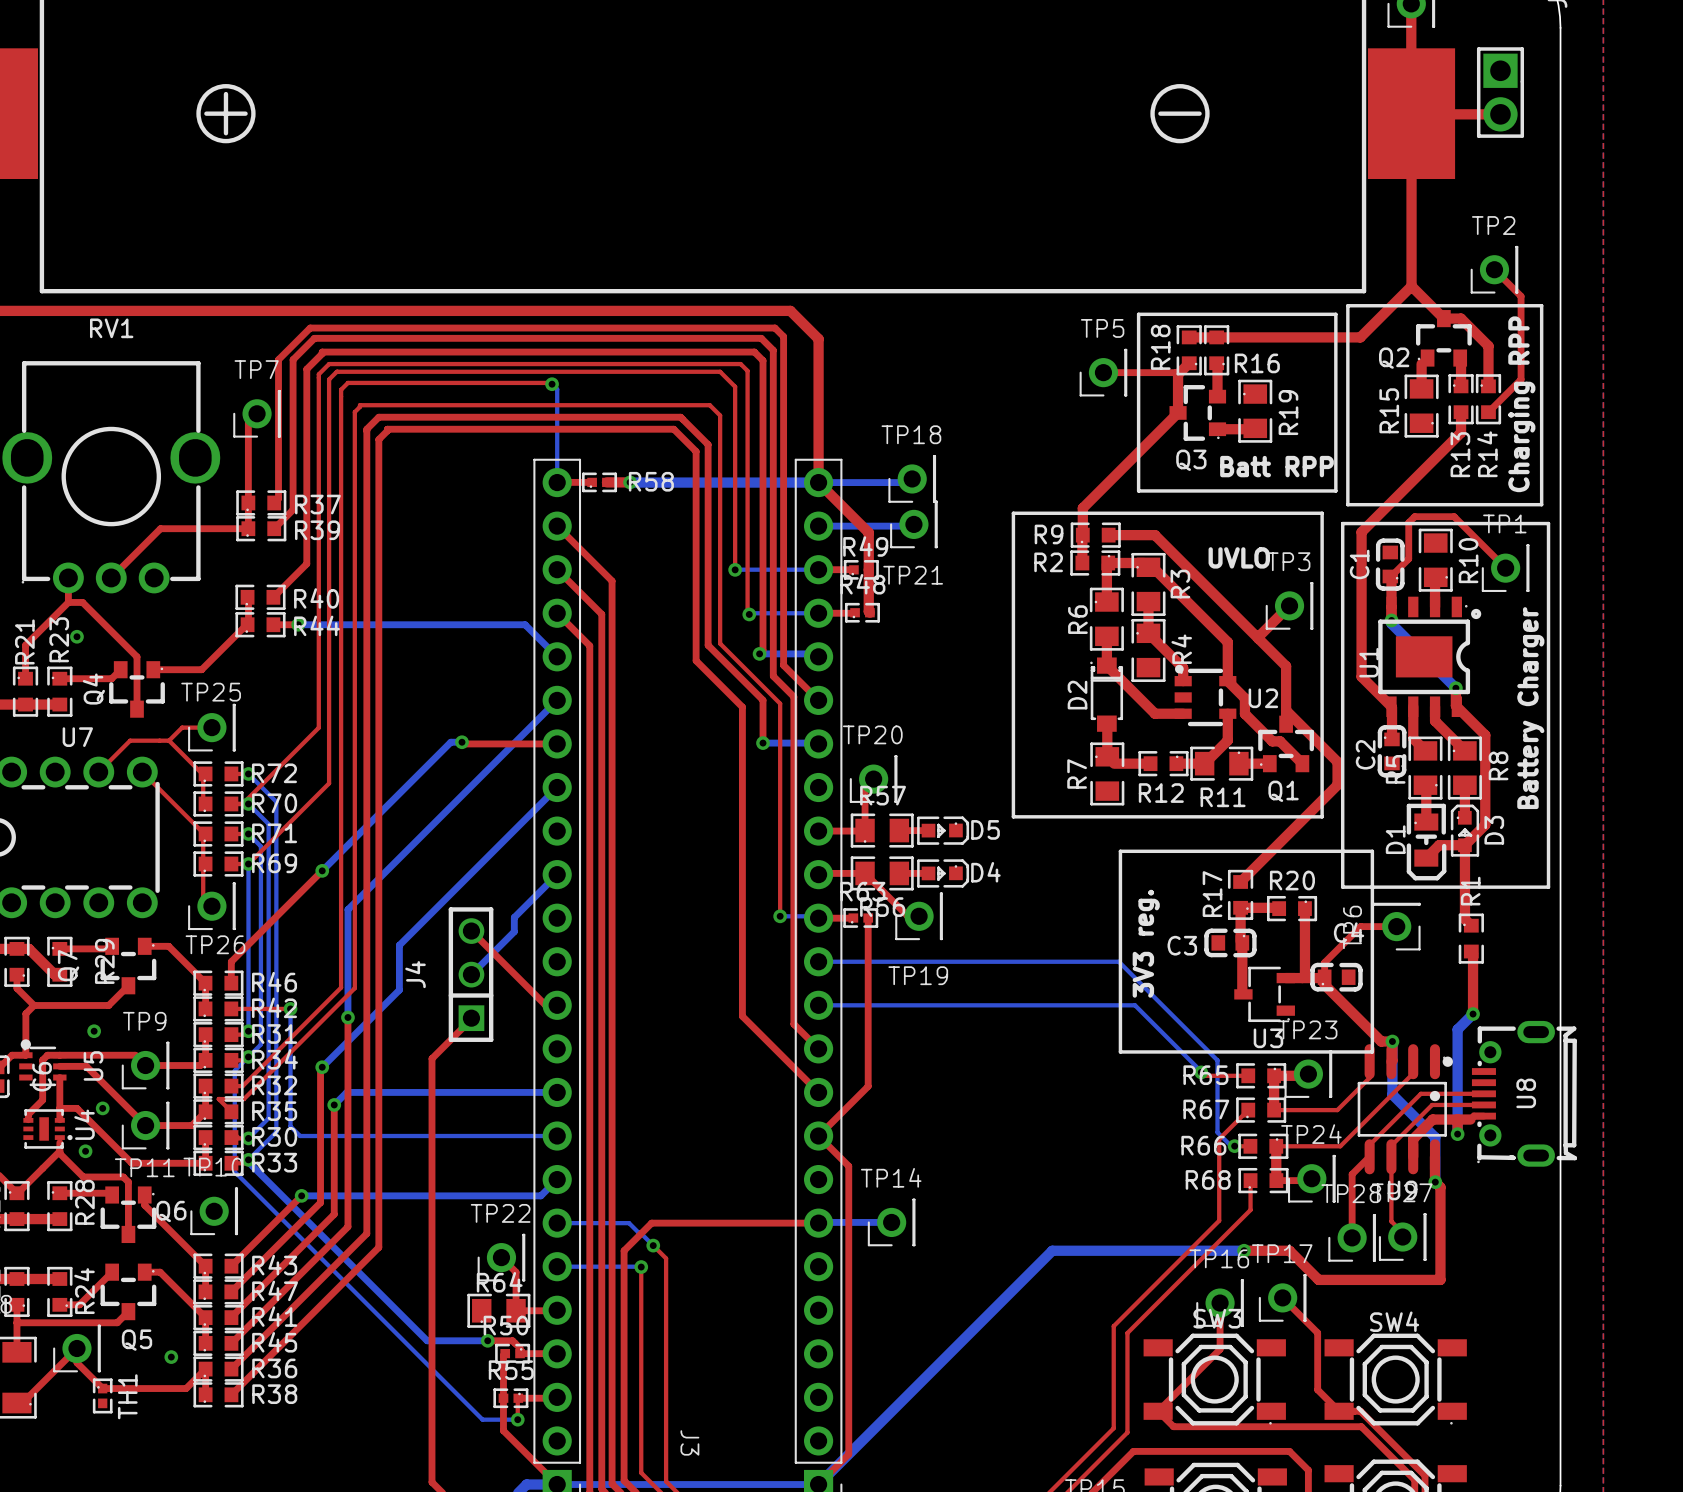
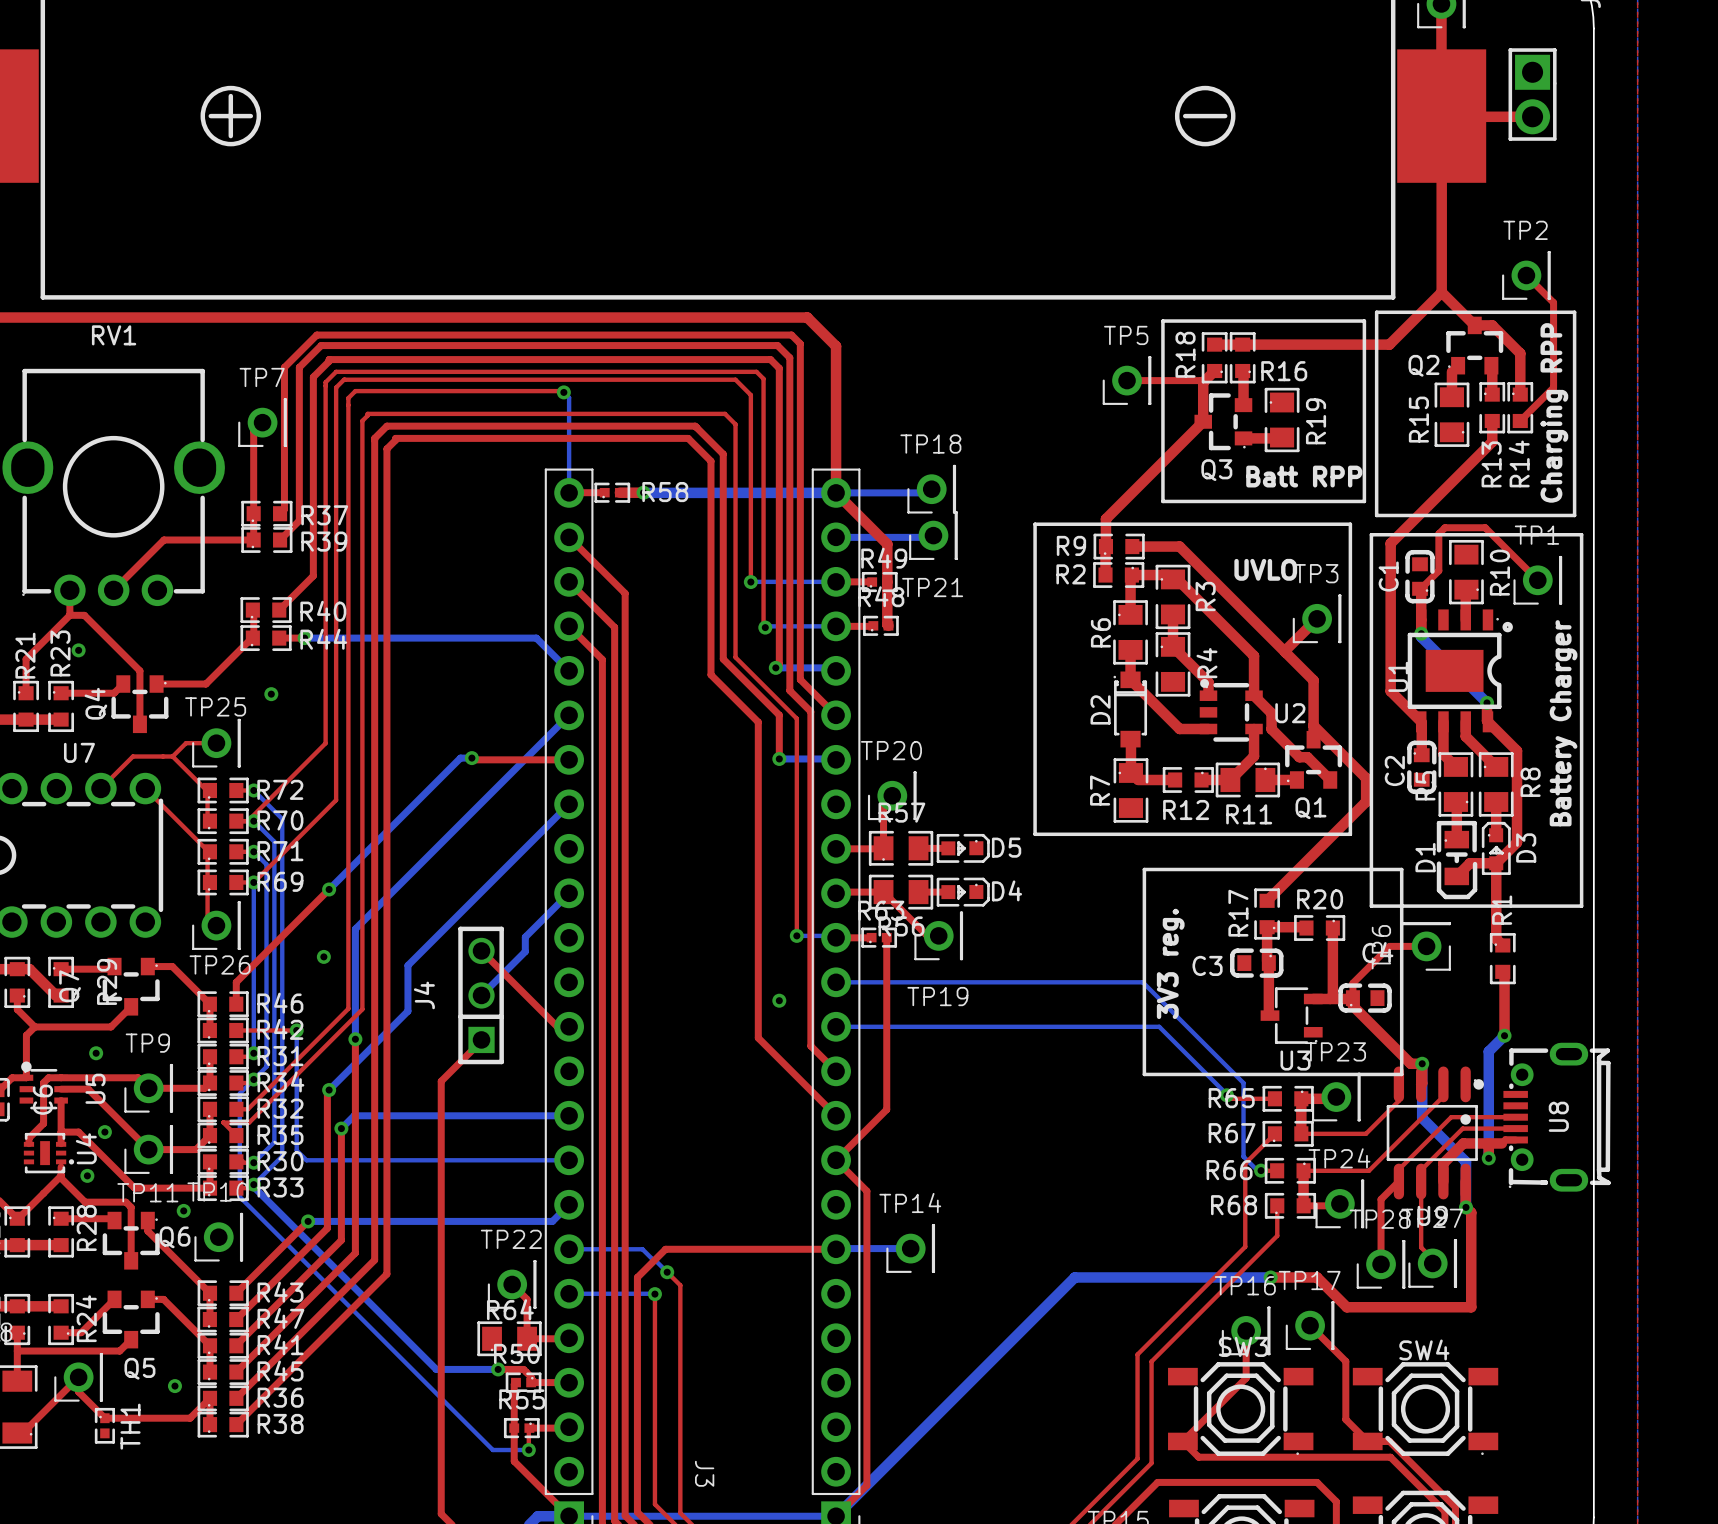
via: none -> (271, 694)
via: none -> (323, 956)
via: none -> (779, 1000)
via: none -> (183, 1210)

